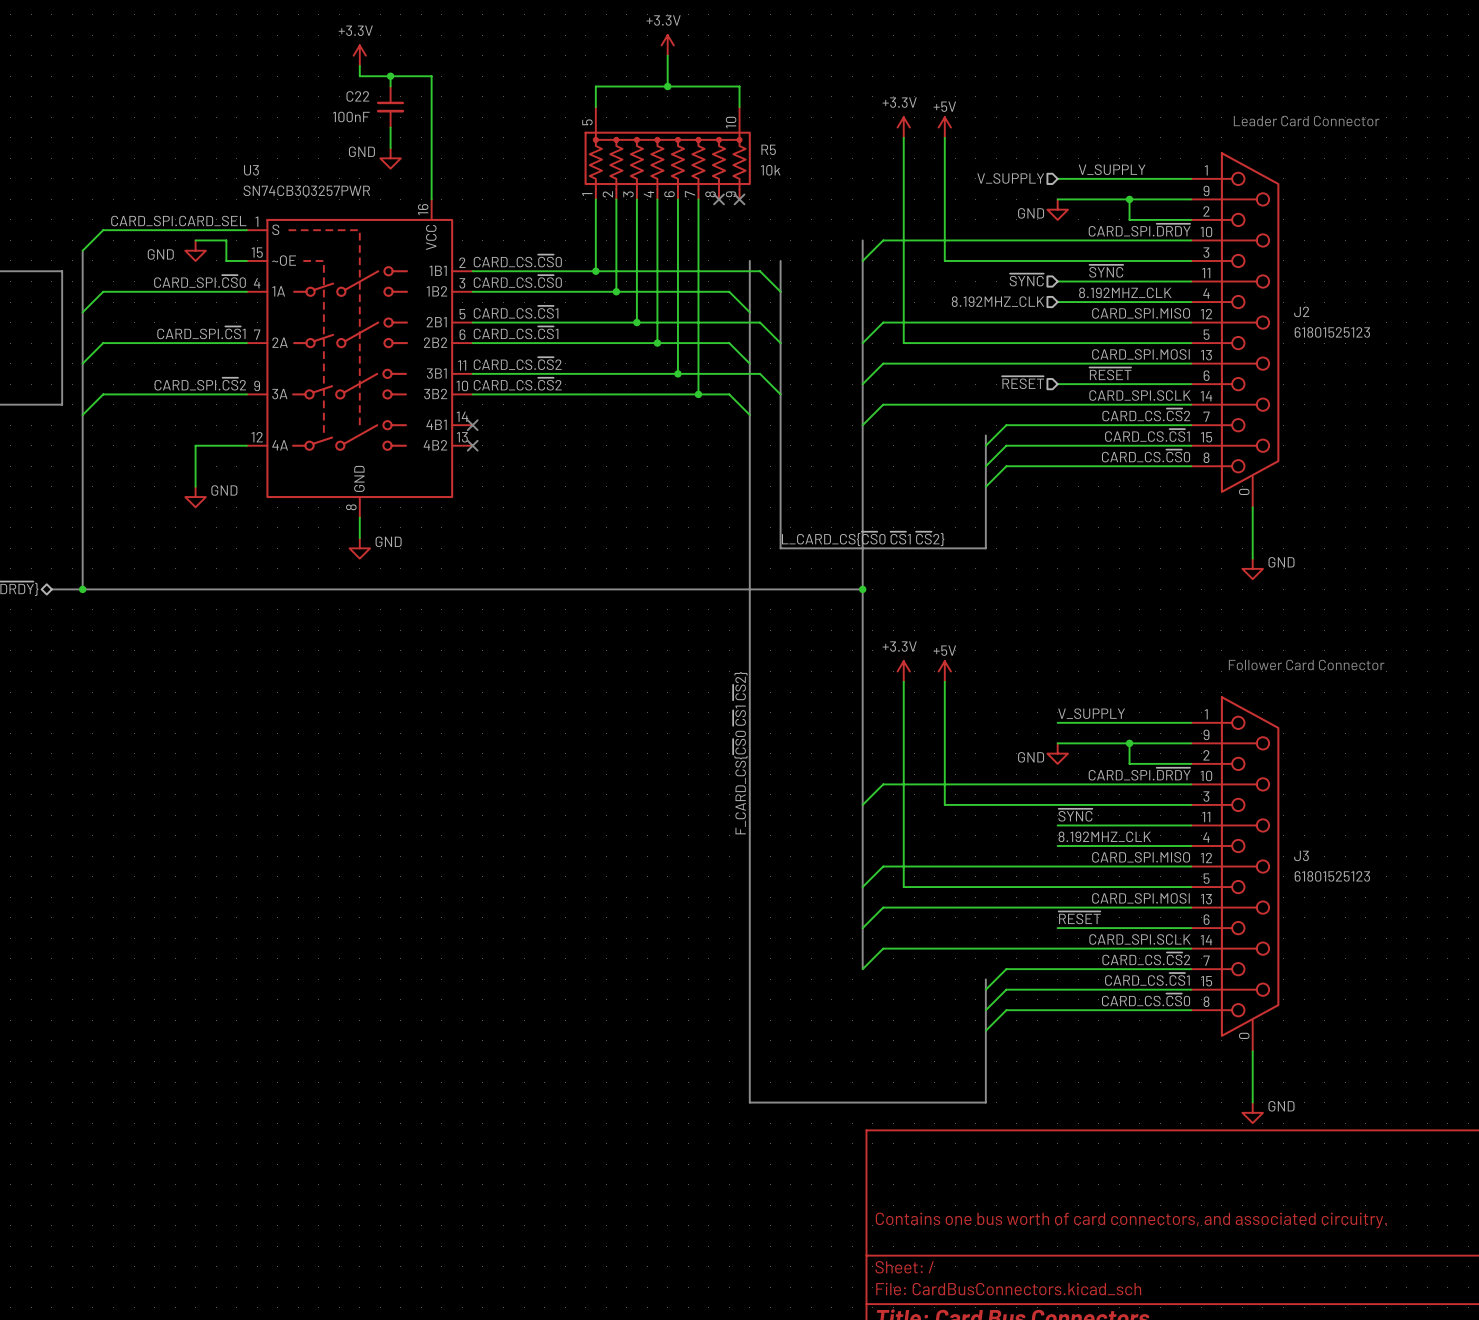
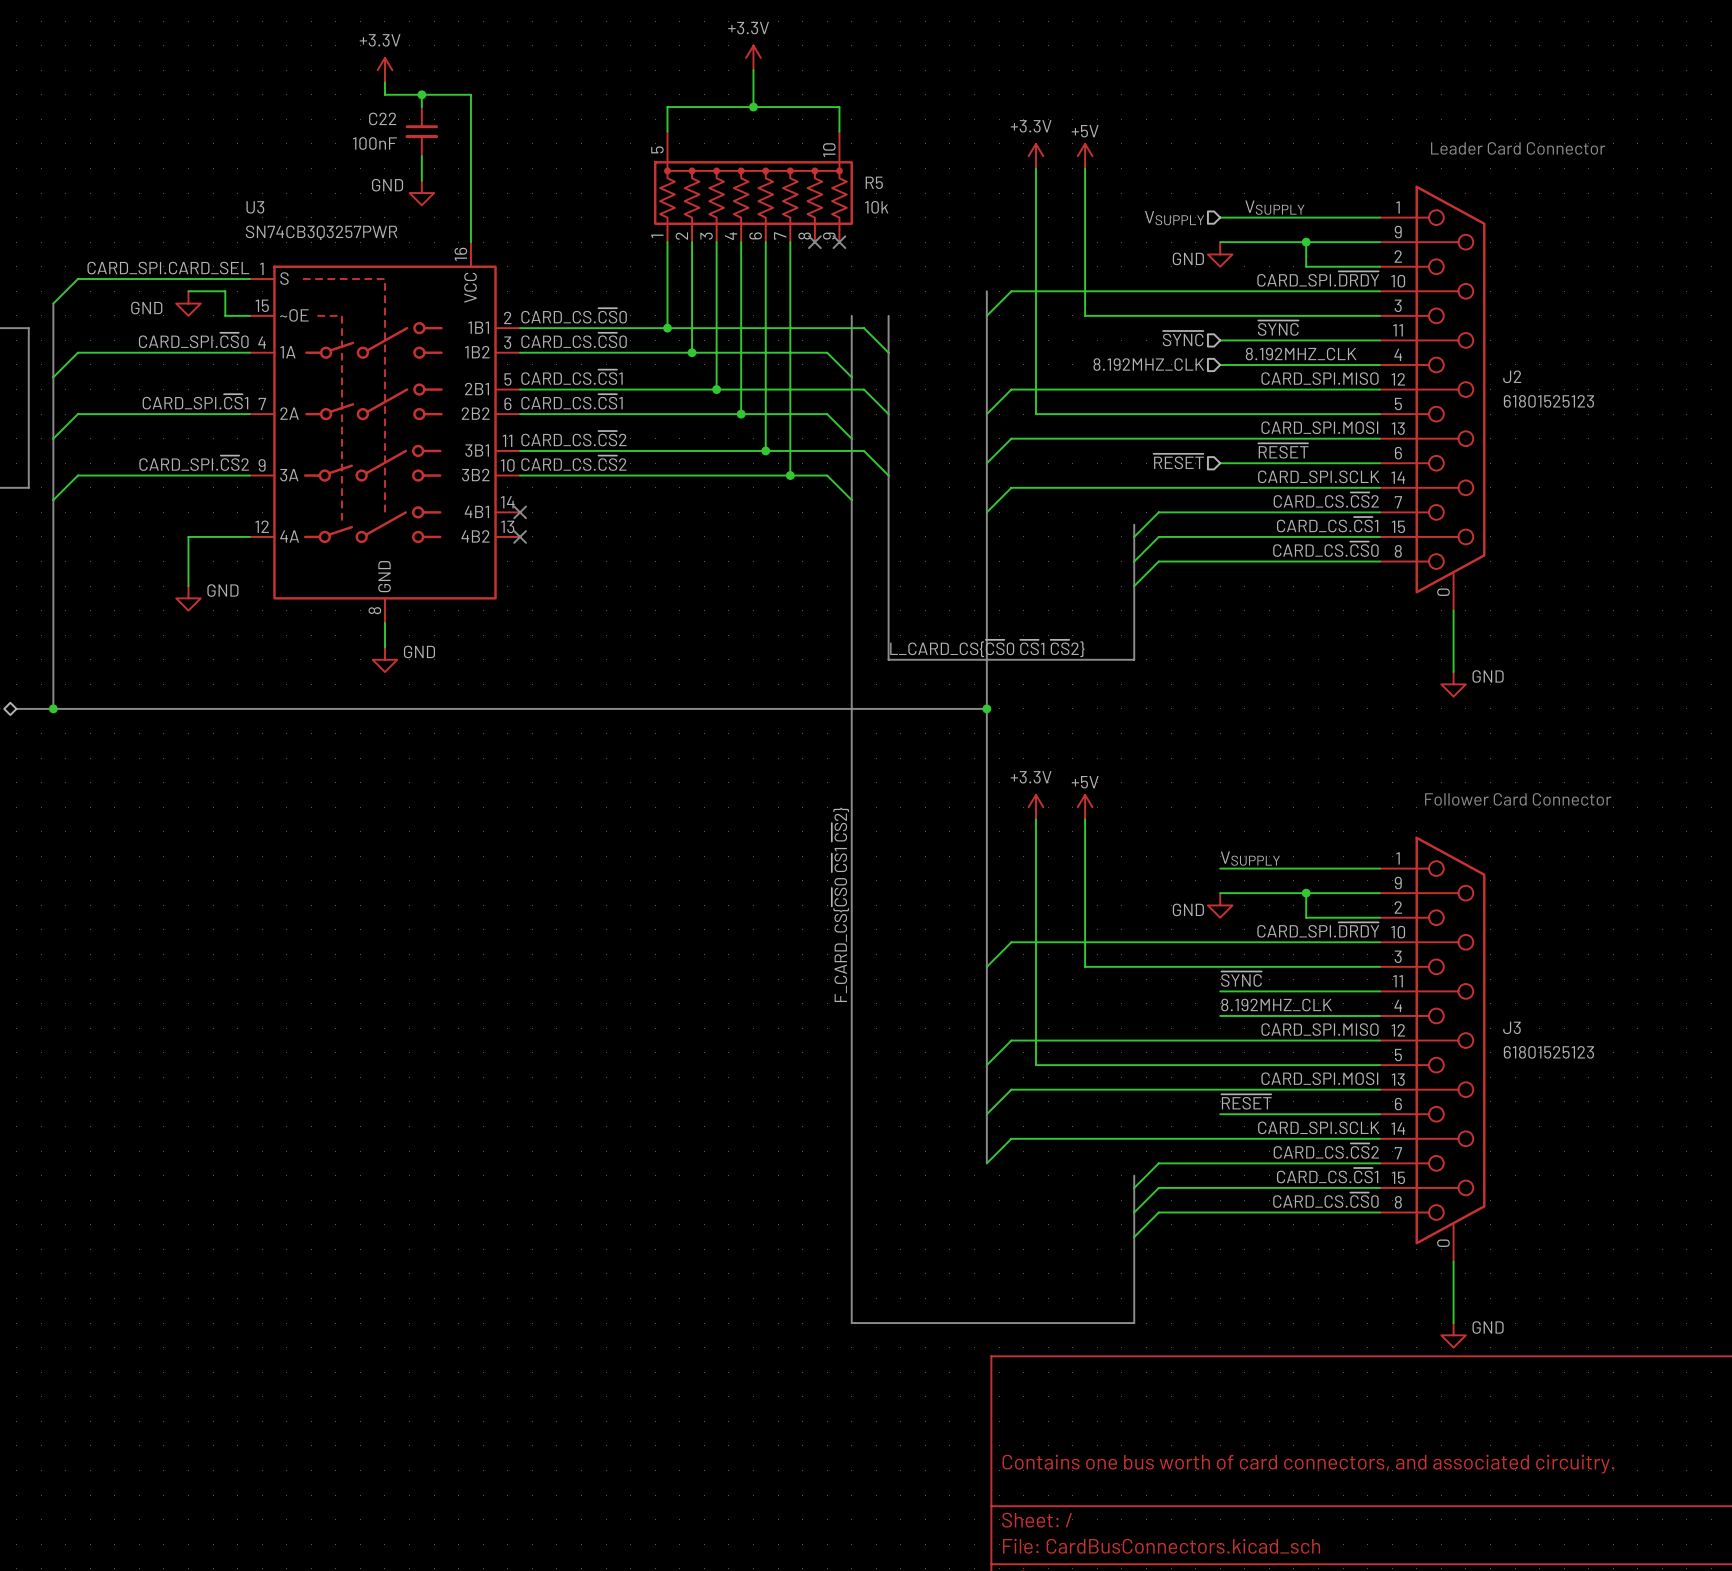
label: V_SUPPLY (1112, 169) -> VSUPPLY (1274, 207)
hierarchical label: V_SUPPLY (1010, 178) -> VSUPPLY (1174, 218)
label: V_SUPPLY (1091, 713) -> VSUPPLY (1250, 858)

